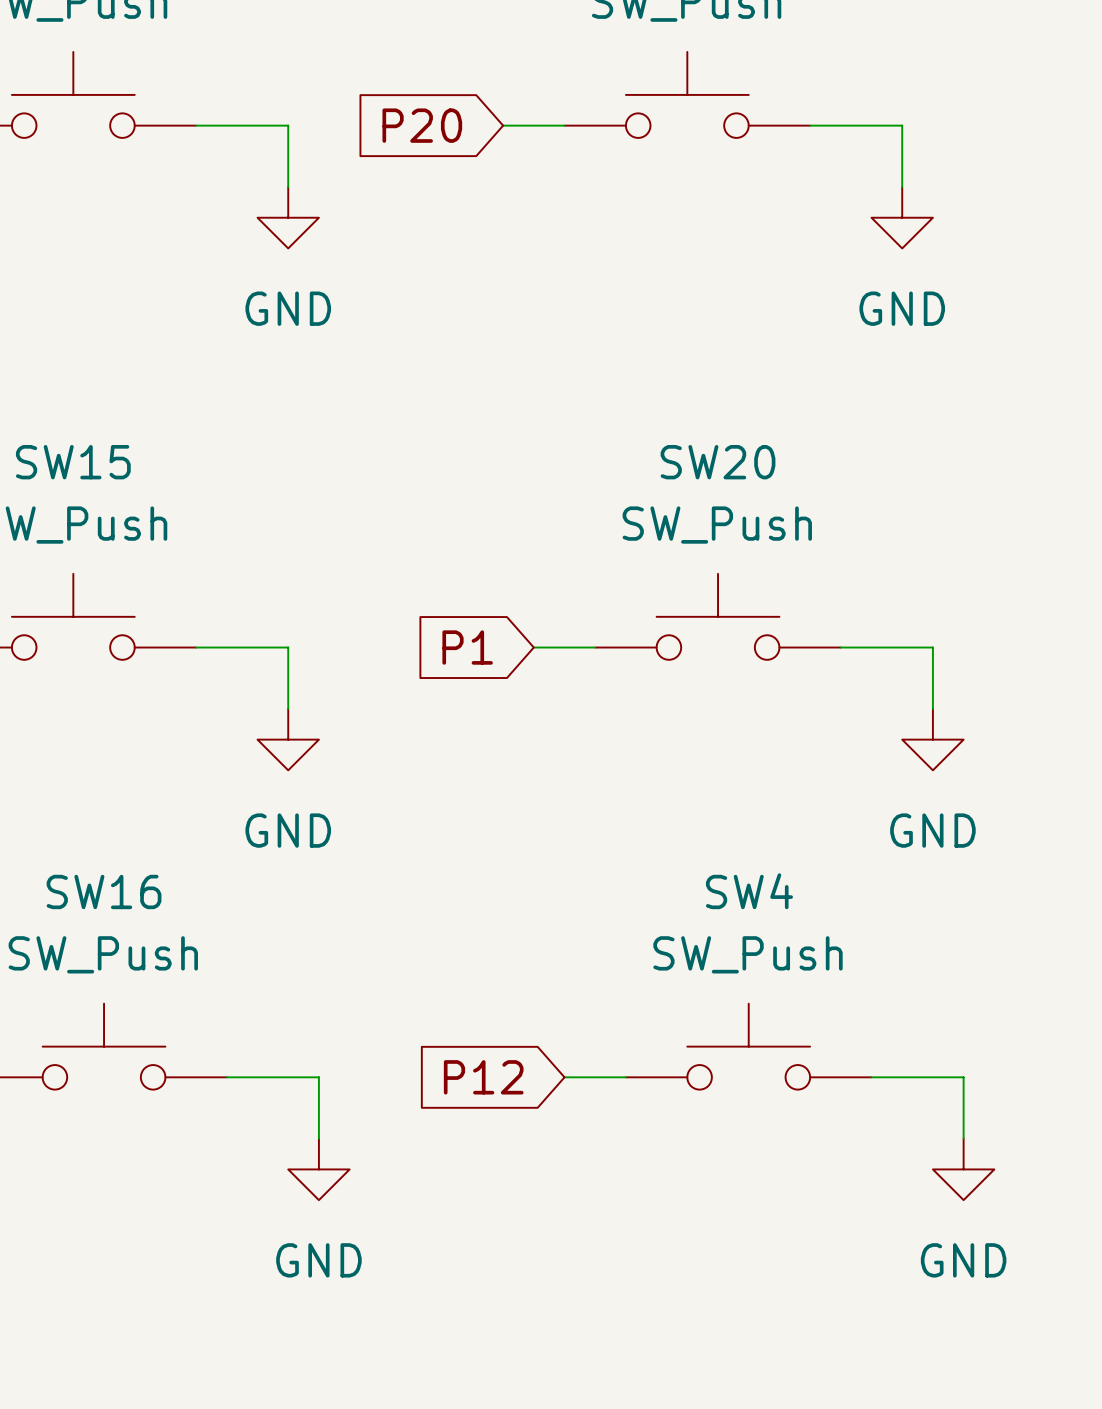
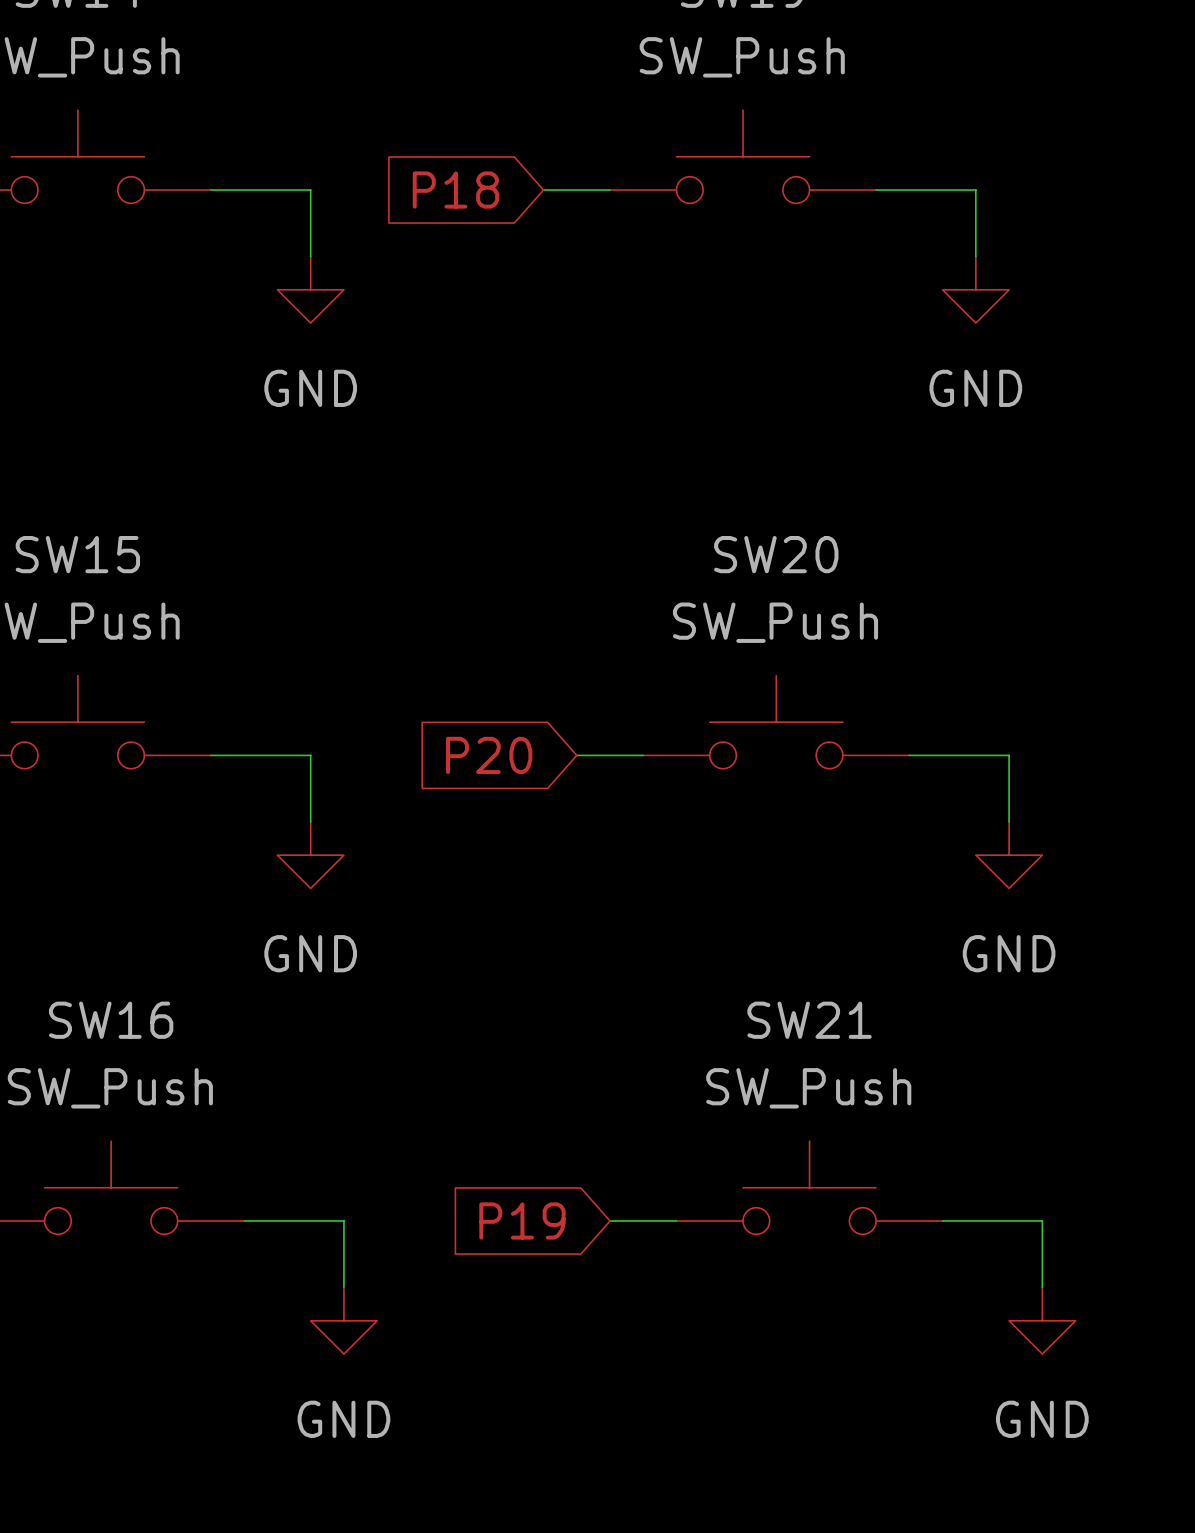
global label: P20 (422, 125) -> P18 (455, 190)
global label: P1 (467, 647) -> P20 (489, 755)
SW4 name: SW4 (749, 891) -> SW21 (809, 1020)
global label: P12 (483, 1077) -> P19 (522, 1221)

